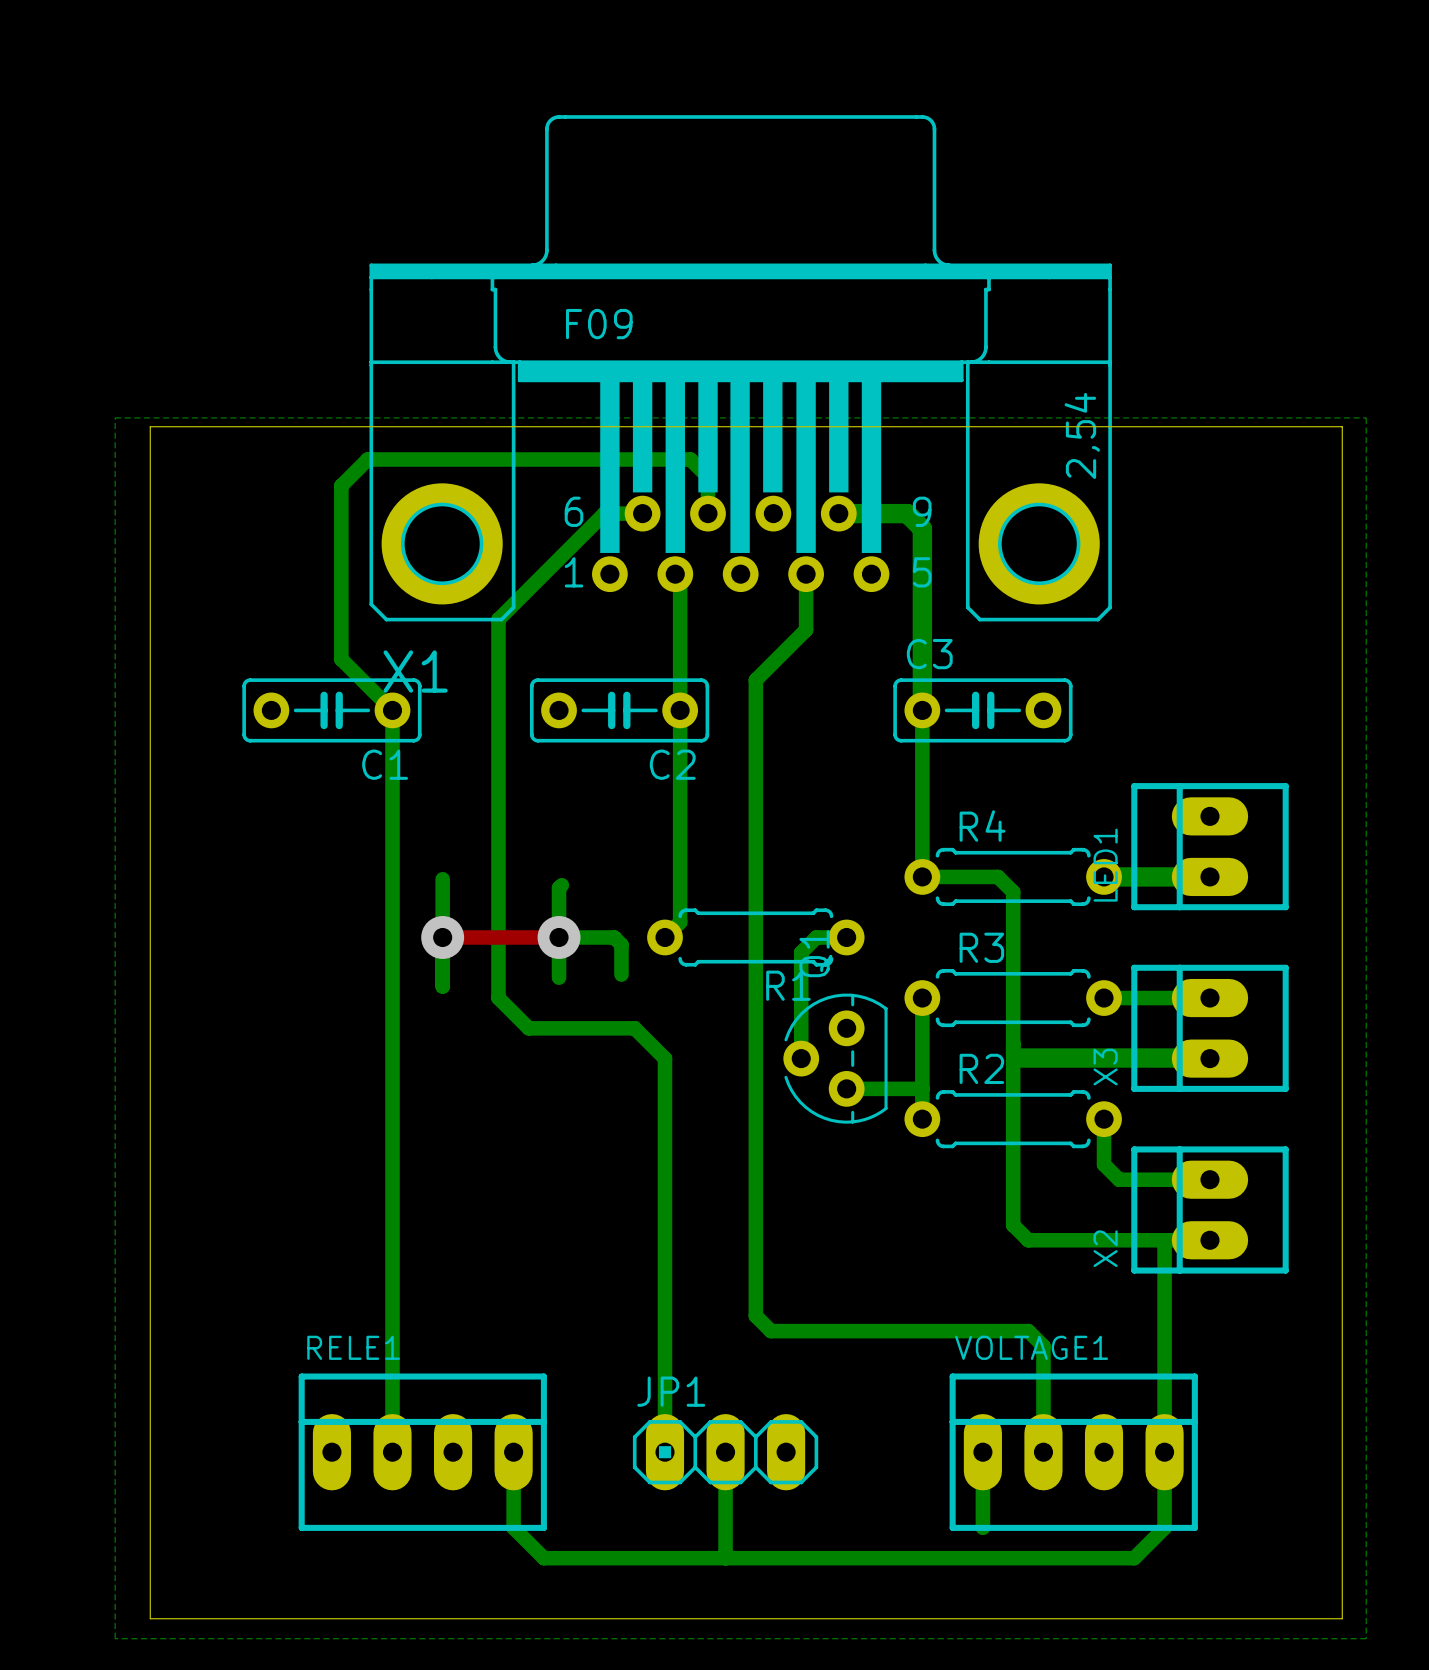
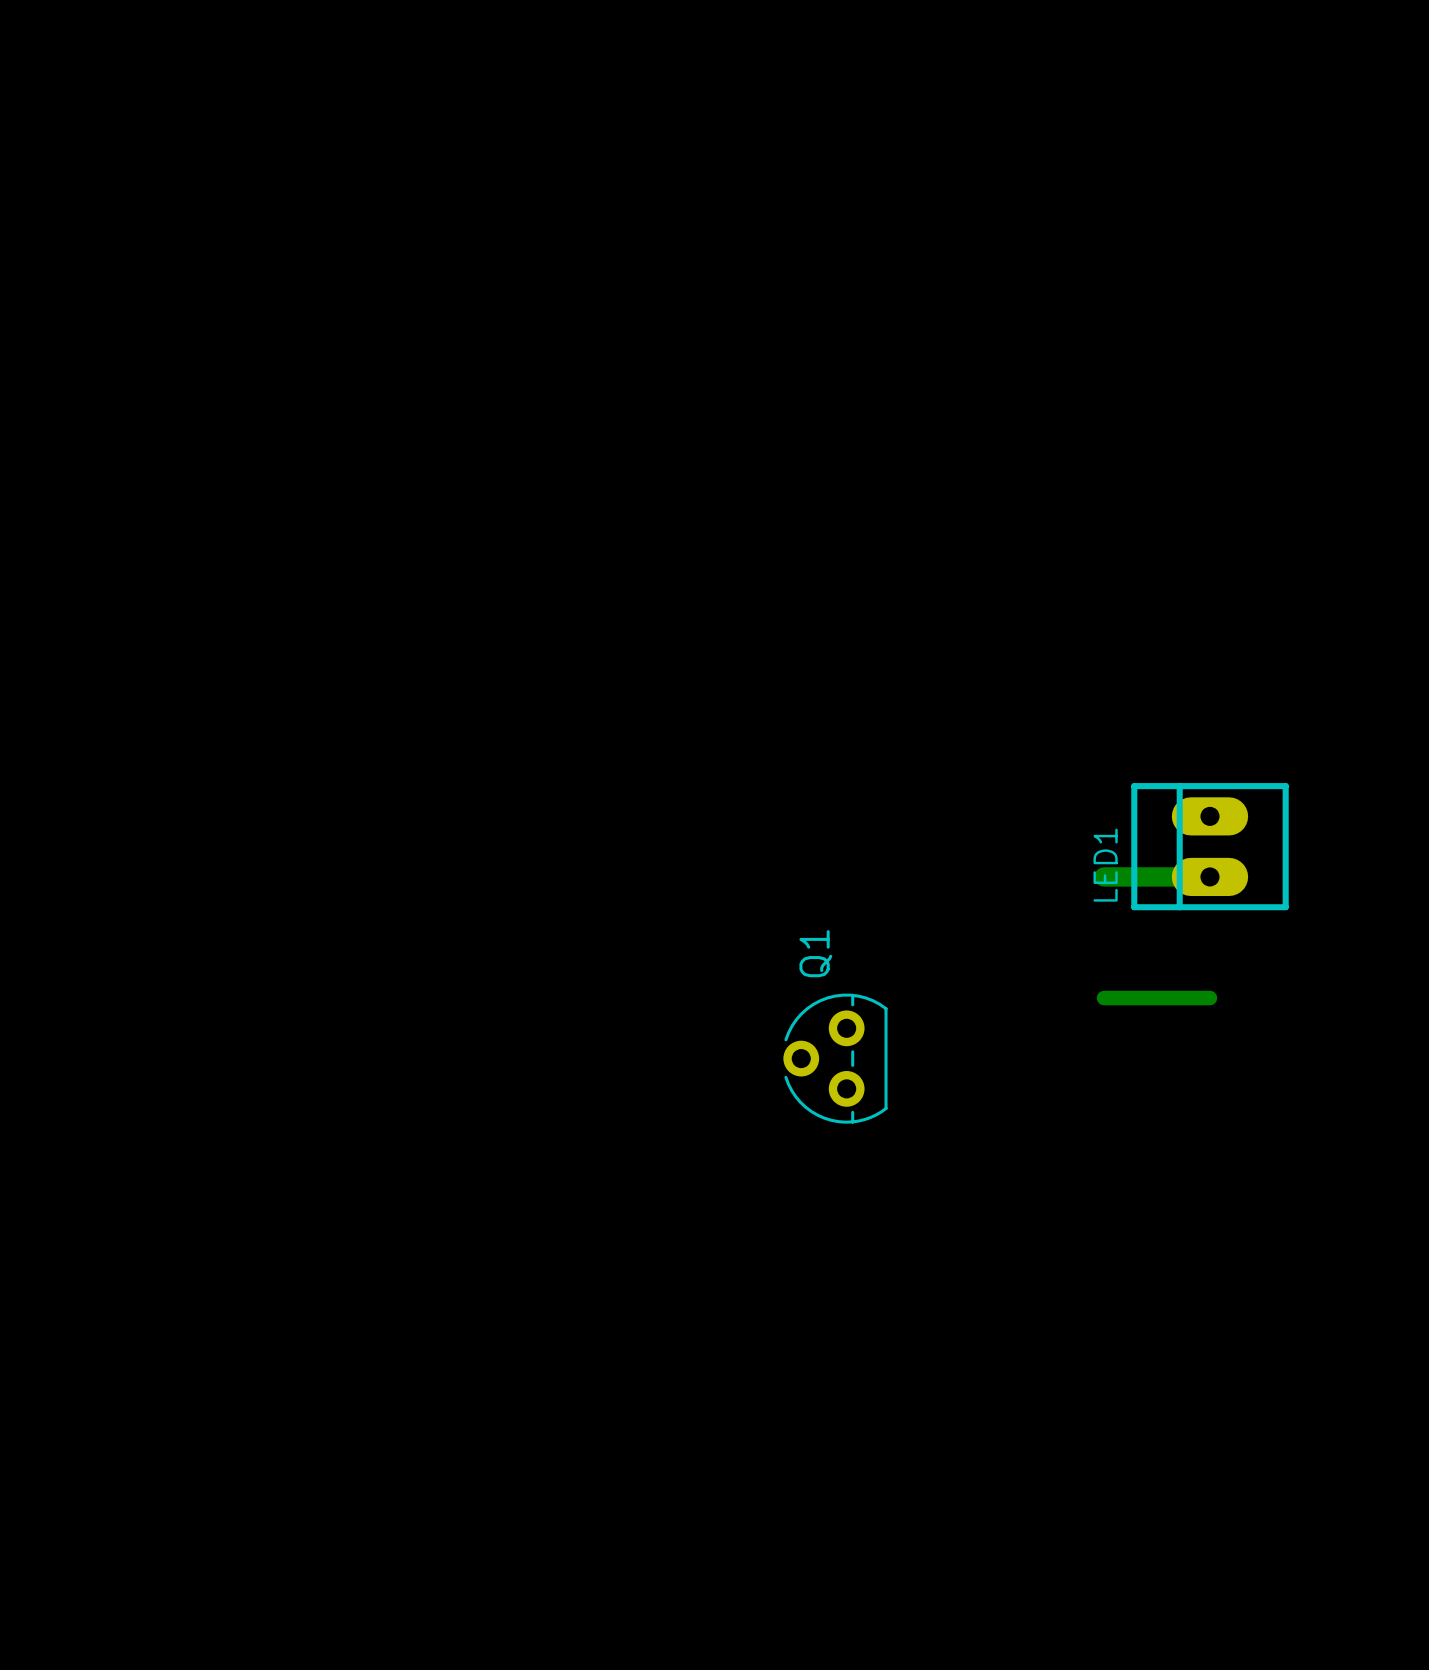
X1: (740, 368) -> none
bottom zone outline: (115, 417) (115, 1638) (1366, 1638) (1366, 417) (115, 417) -> none
board edge: (150, 426) (1342, 426) (1342, 1618) (150, 1618) (150, 426) -> none
bottom track: (642, 513) (604, 513) (498, 619) (498, 998) (528, 1028) (634, 1028) (665, 1058) (665, 1452) -> none
bottom track: (707, 513) (707, 477) (690, 459) (367, 459) (341, 485) (341, 659) (392, 710) (392, 1452) -> none
bottom track: (838, 513) (907, 513) (922, 528) (922, 876) (998, 876) (1013, 892) (1013, 1225) (1028, 1240) (1209, 1240) -> none
bottom track: (675, 574) (680, 579) (680, 922) (665, 937) -> none
bottom track: (806, 574) (806, 629) (755, 680) (755, 1315) (770, 1331) (1028, 1331) (1043, 1346) (1043, 1452) -> none
C1: (331, 710) -> none
C2: (619, 710) -> none
C3: (982, 710) -> none
R4: (1013, 876) -> none
bottom track: (442, 879) (442, 986) -> none
bottom track: (561, 885) (559, 888) (559, 977) -> none
top track: (442, 937) (559, 937) -> none
via: (442, 937) -> none
bottom track: (559, 937) (614, 937) (621, 944) (621, 974) -> none
via: (559, 937) -> none
R1: (755, 937) -> none
bottom track: (846, 937) (816, 937) (801, 952) (801, 1058) -> none
bottom track: (922, 998) (922, 1119) -> none
R3: (1013, 998) -> none
X3: (1209, 1028) -> none
bottom track: (1013, 1056) (1014, 1058) (1209, 1058) -> none
bottom track: (846, 1088) (922, 1088) -> none
R2: (1013, 1119) -> none
bottom track: (1104, 1119) (1104, 1164) (1119, 1179) (1209, 1179) -> none
X2: (1209, 1209) -> none
bottom track: (1164, 1240) (1164, 1527) (1134, 1558) (543, 1558) (513, 1527) (513, 1452) -> none
RELE1: (422, 1452) -> none
bottom track: (725, 1452) (725, 1558) -> none
JP1: (725, 1452) -> none
bottom track: (982, 1452) (982, 1527) -> none
VOLTAGE1: (1073, 1452) -> none

